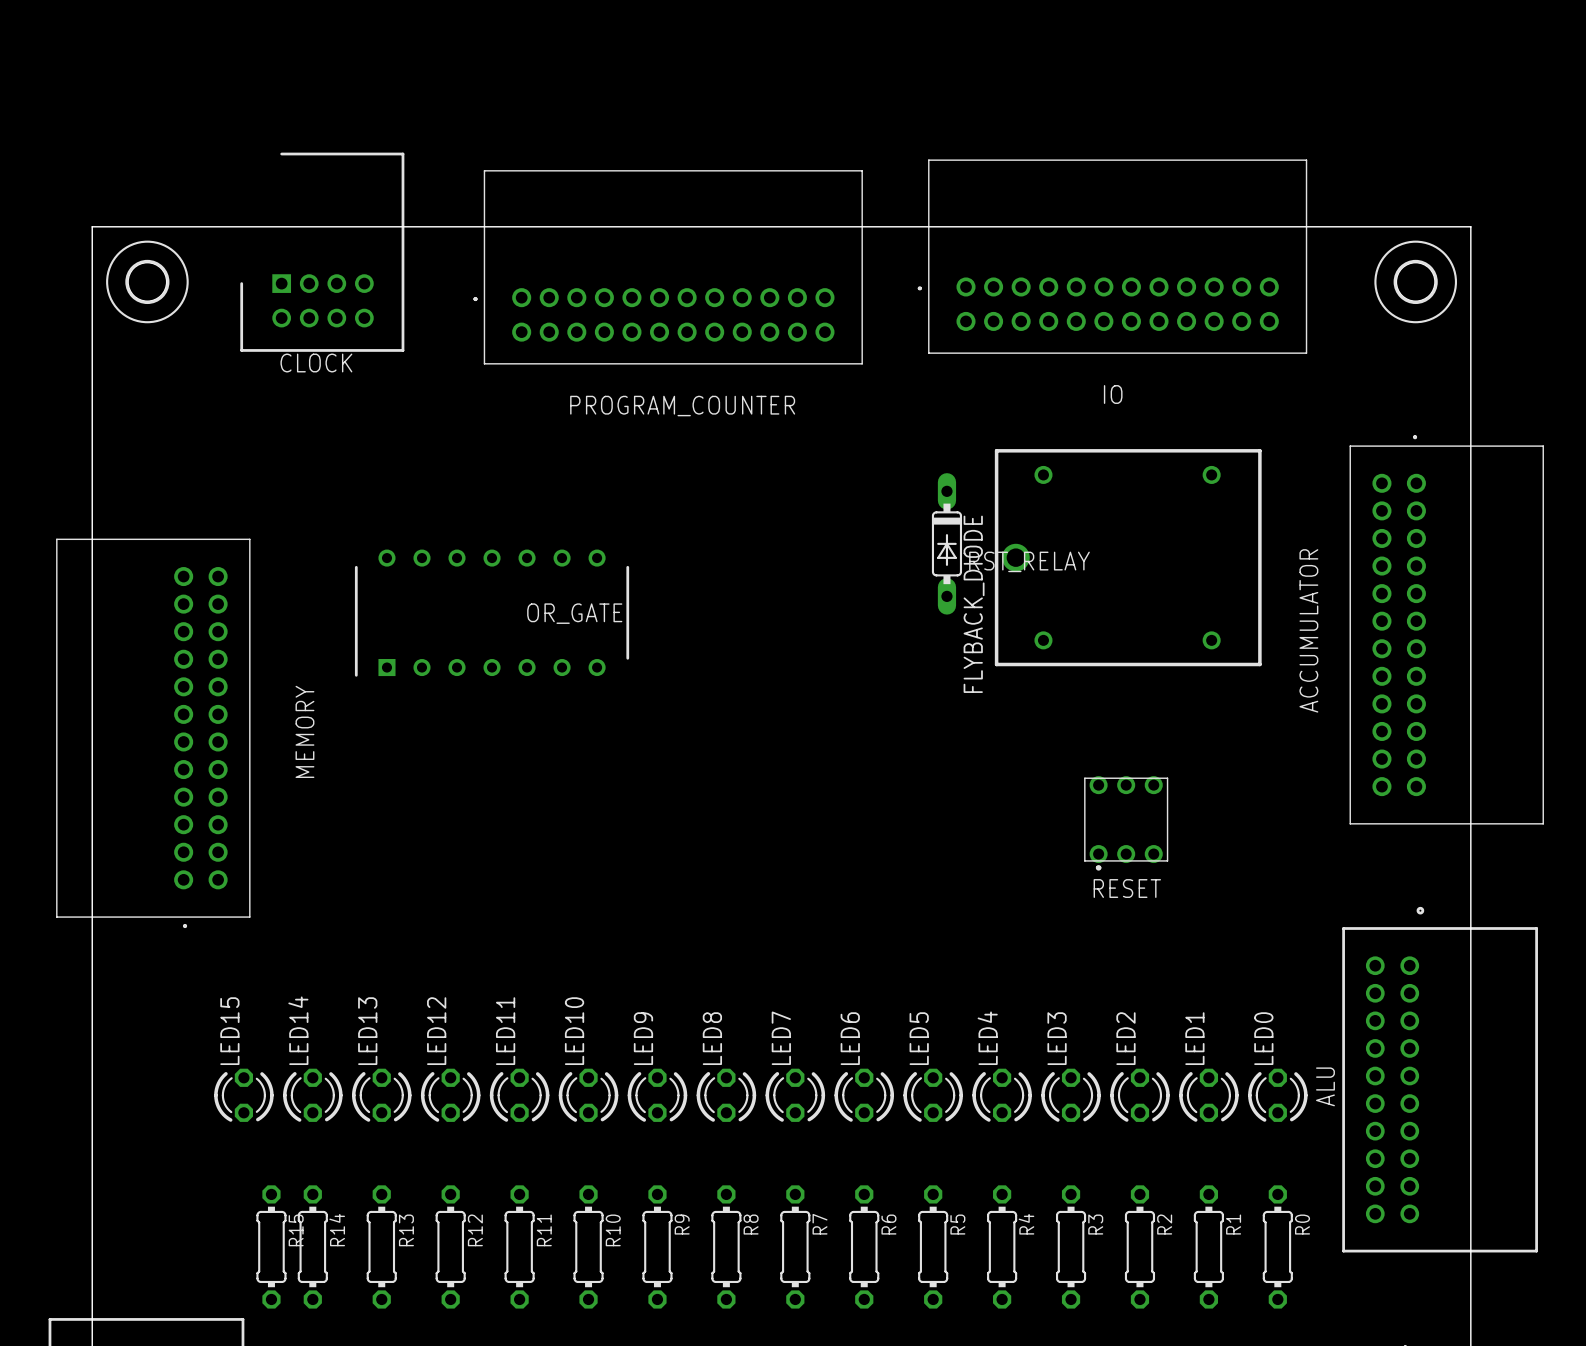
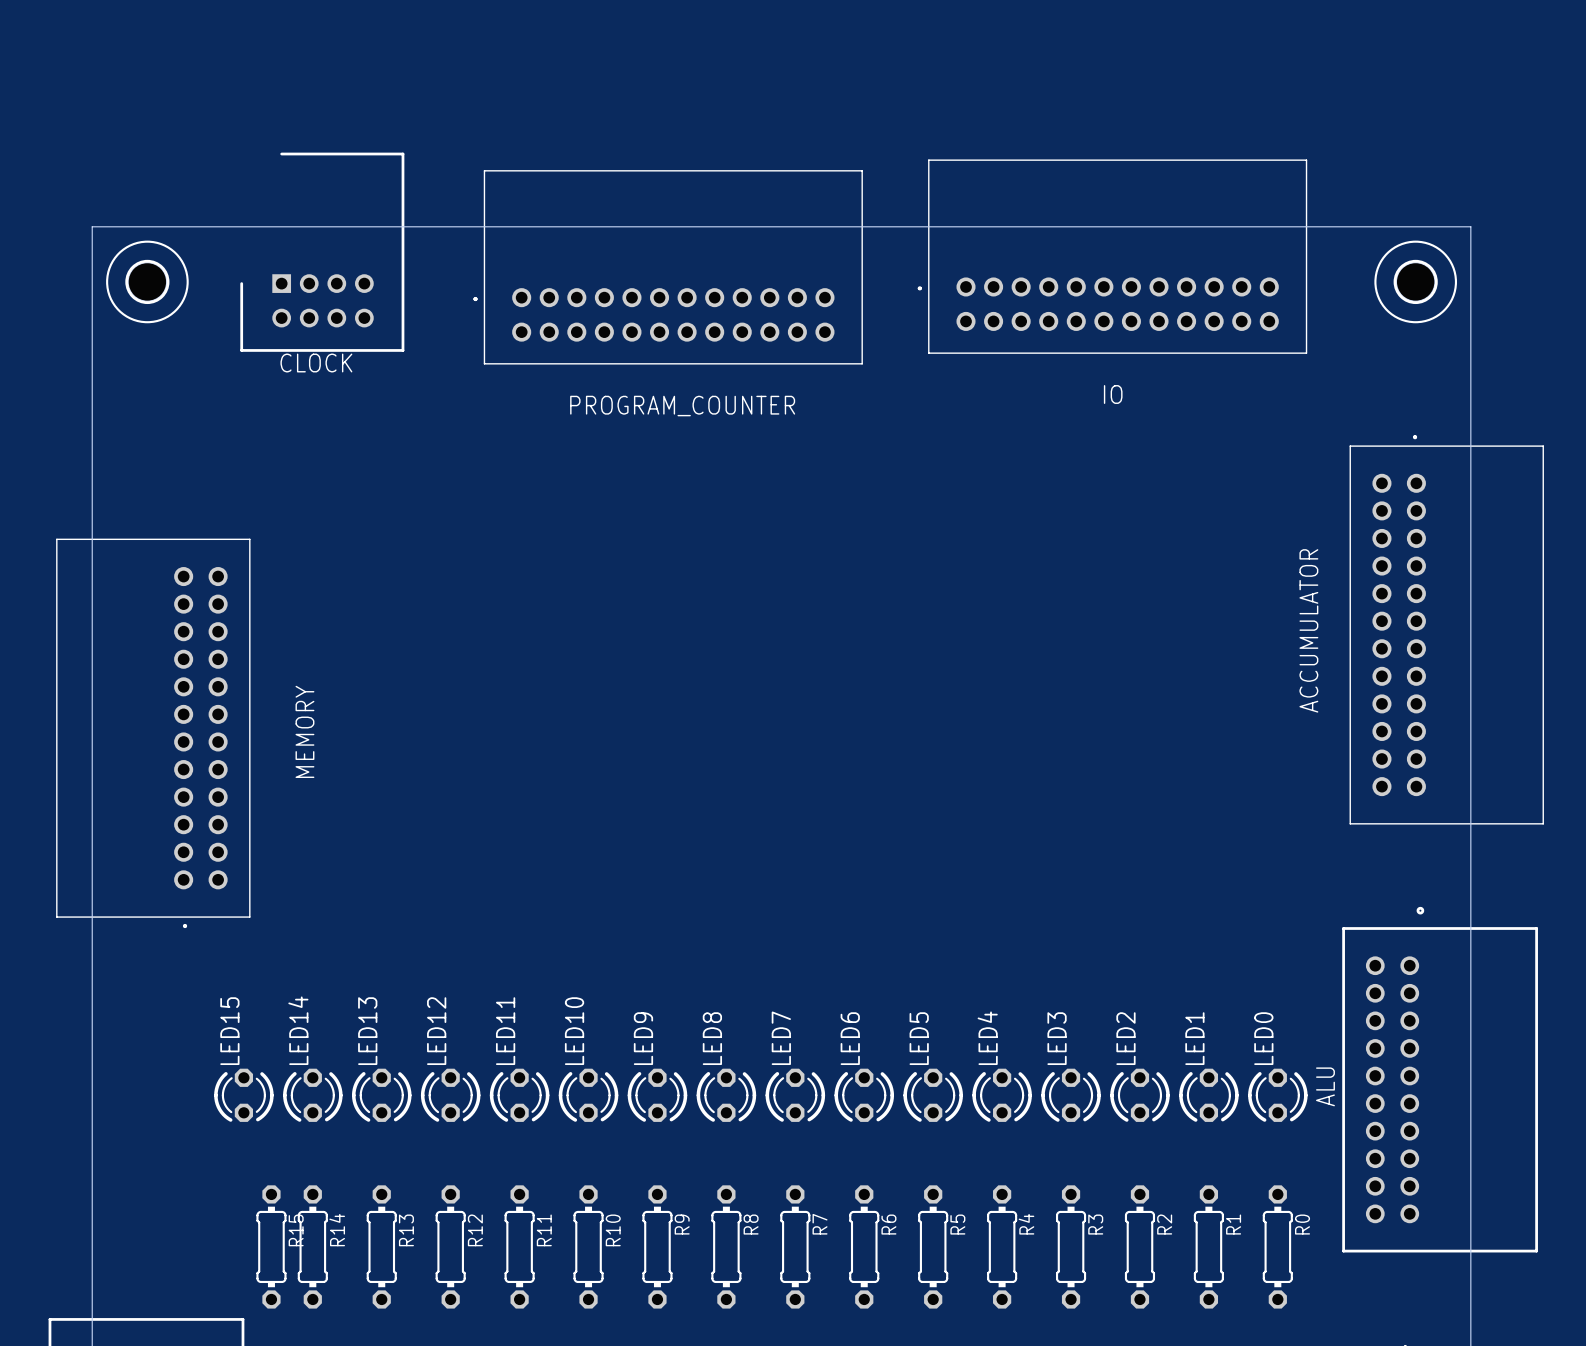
FLYBACK_DIODE: (946, 543) -> none
RST_RELAY: (1128, 557) -> none
OR_GATE: (492, 613) -> none
RESET: (1126, 823) -> none

